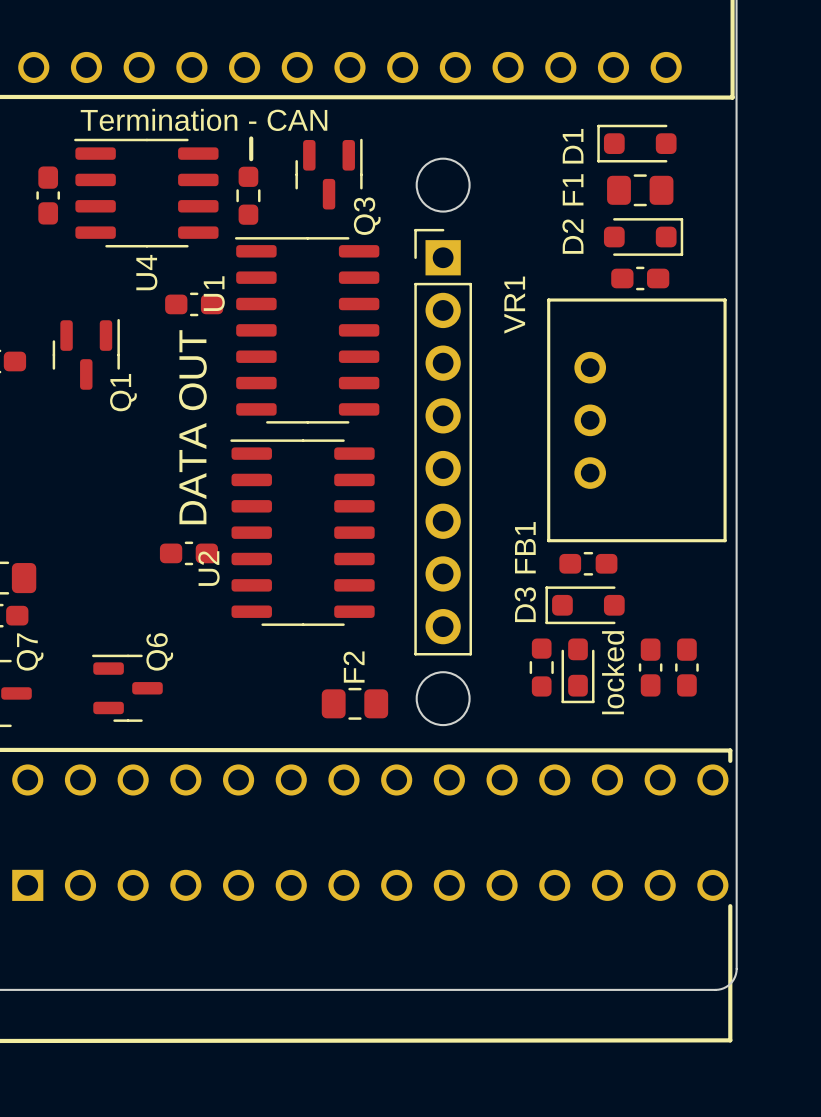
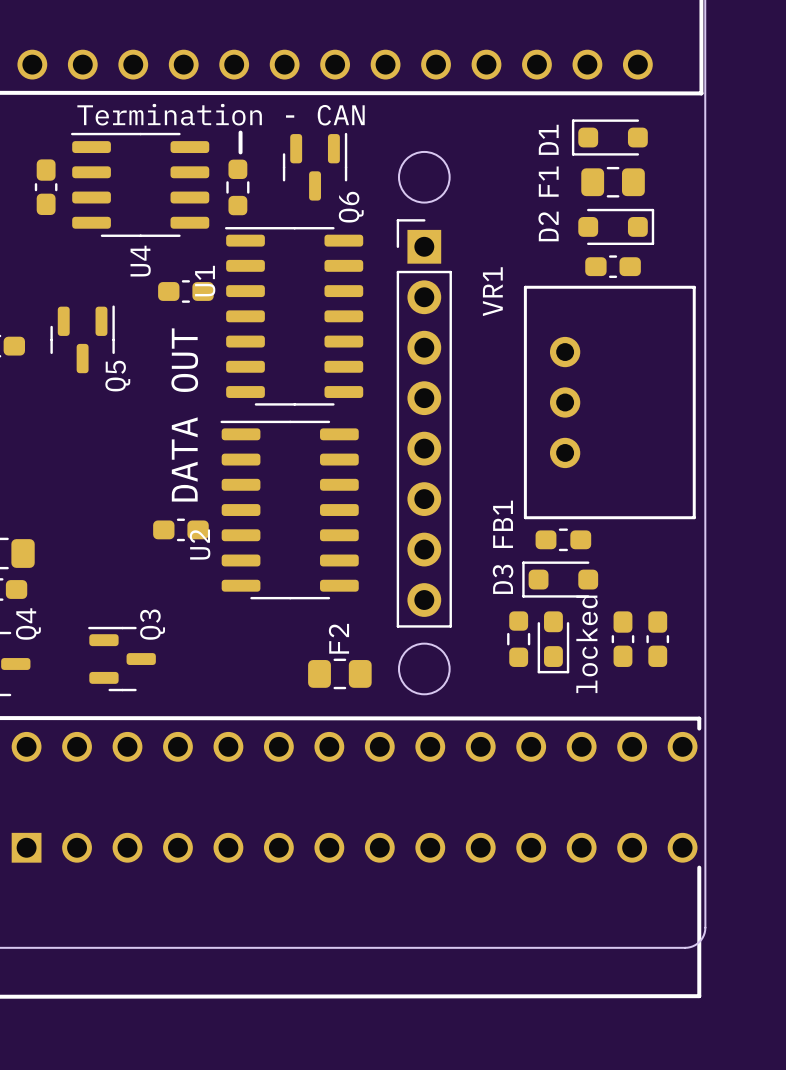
Q3 name: Q3 (367, 216) -> Q6 (351, 207)
Q1 name: Q1 (123, 392) -> Q5 (117, 376)
Q6 name: Q6 (159, 651) -> Q3 (152, 624)
Q7 name: Q7 (30, 652) -> Q4 (28, 624)

